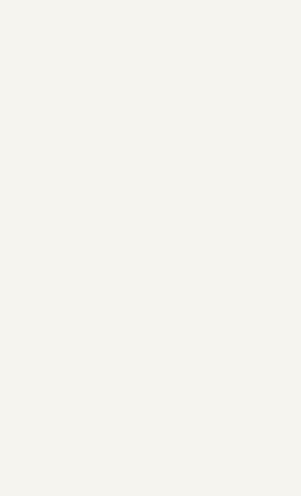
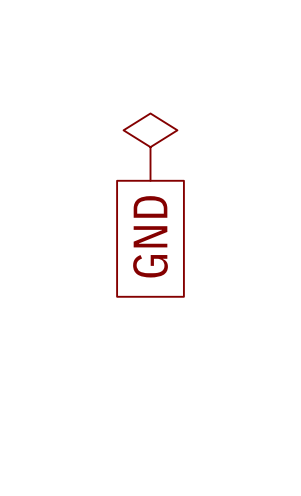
power symbol: none -> (150, 147)
global label: none -> GND (150, 236)

